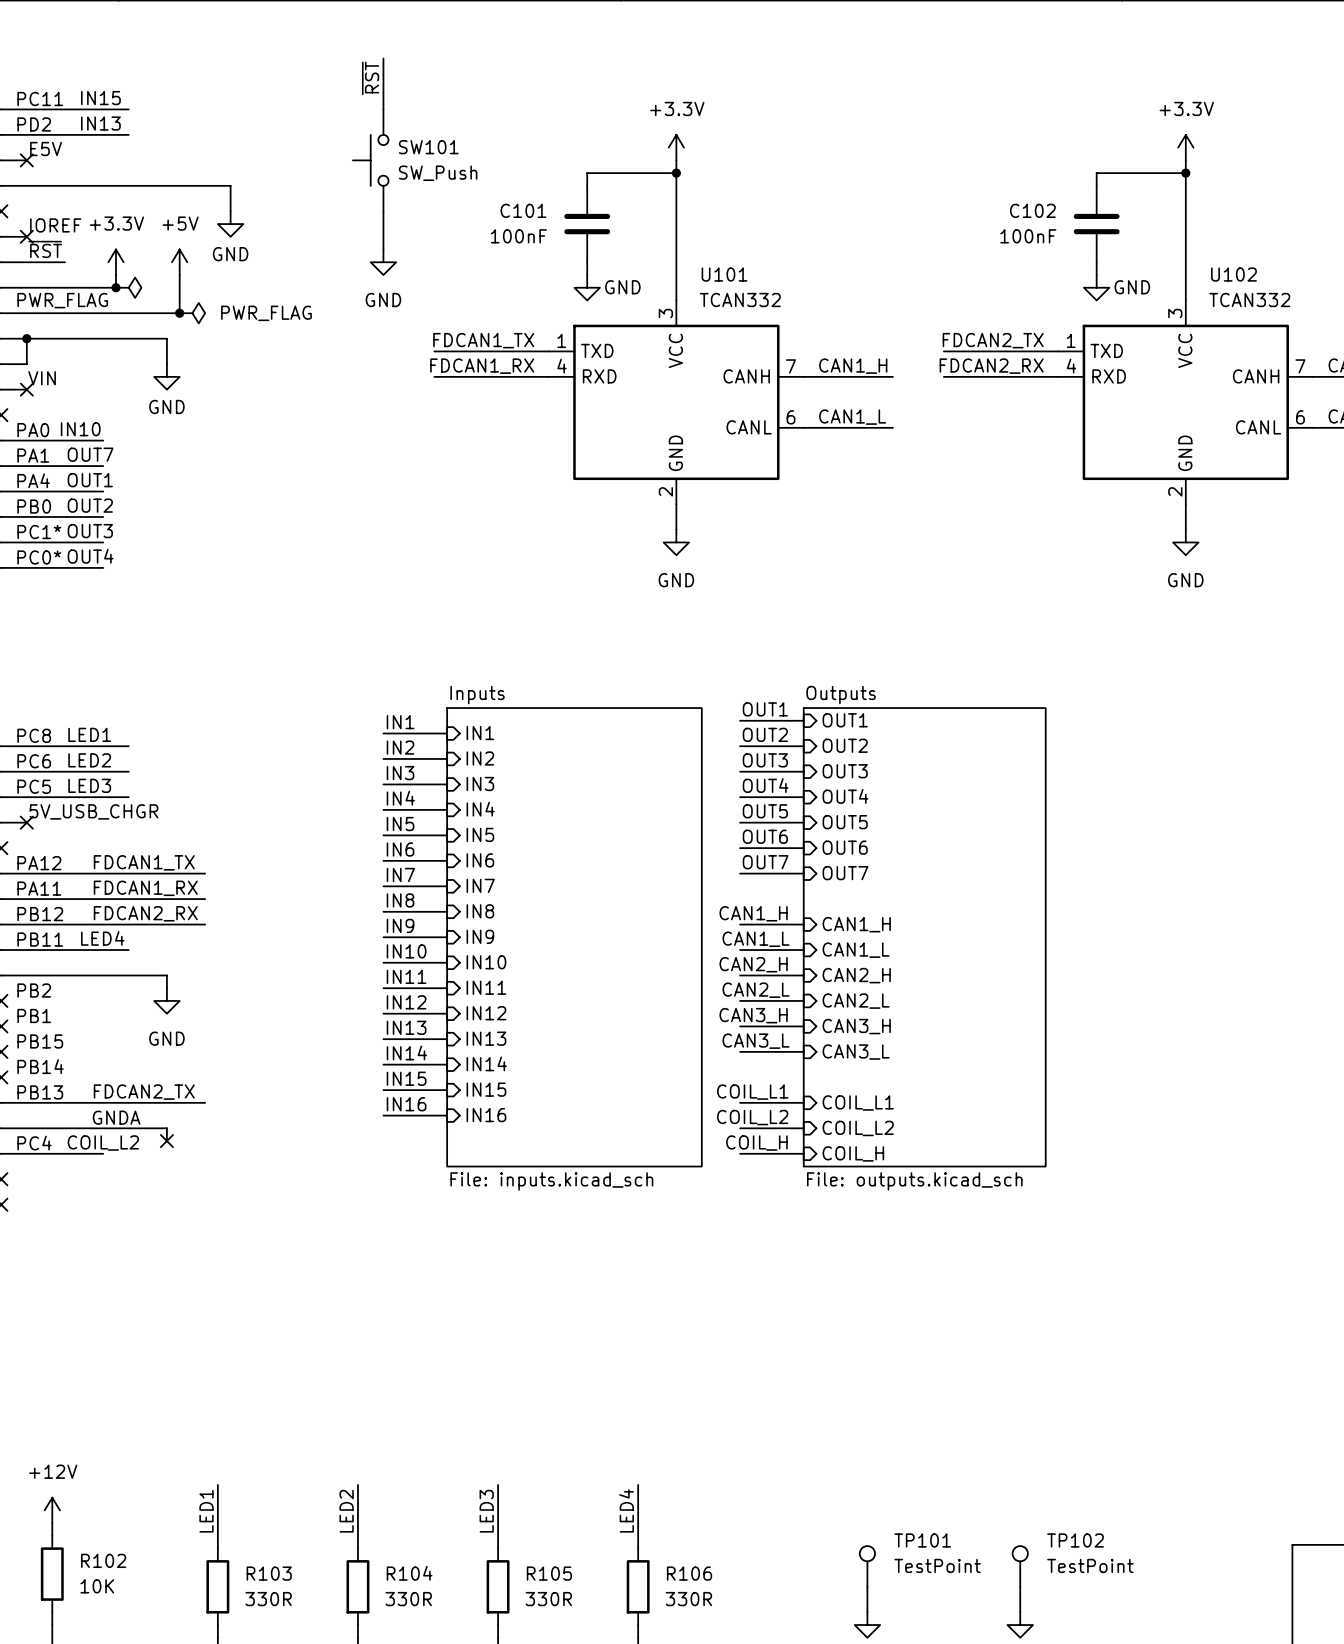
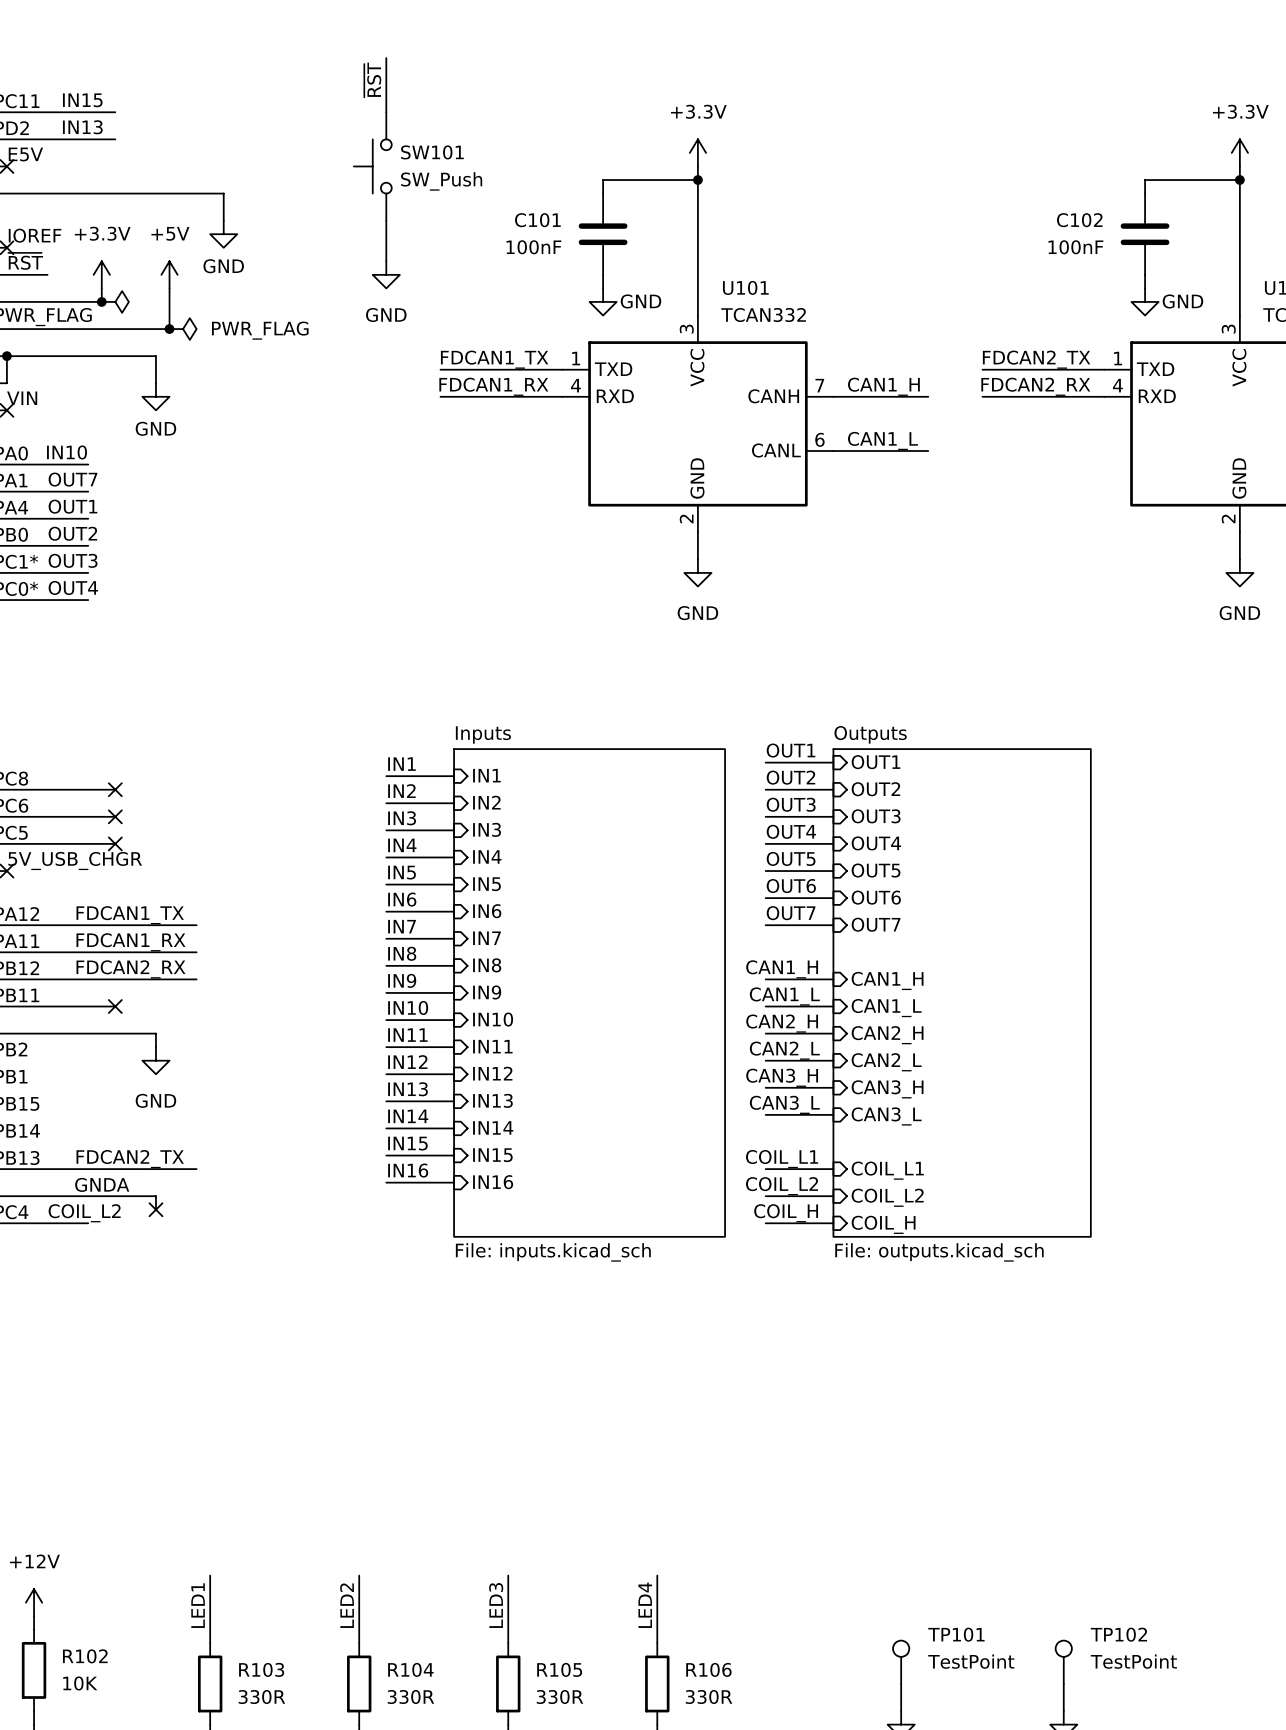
label: LED1 (89, 734) -> none
no-connect mark: none -> (115, 789)
label: LED2 (89, 760) -> none
no-connect mark: none -> (115, 816)
label: LED3 (89, 785) -> none
no-connect mark: none -> (115, 843)
label: LED4 (102, 938) -> none
no-connect mark: none -> (115, 1006)

